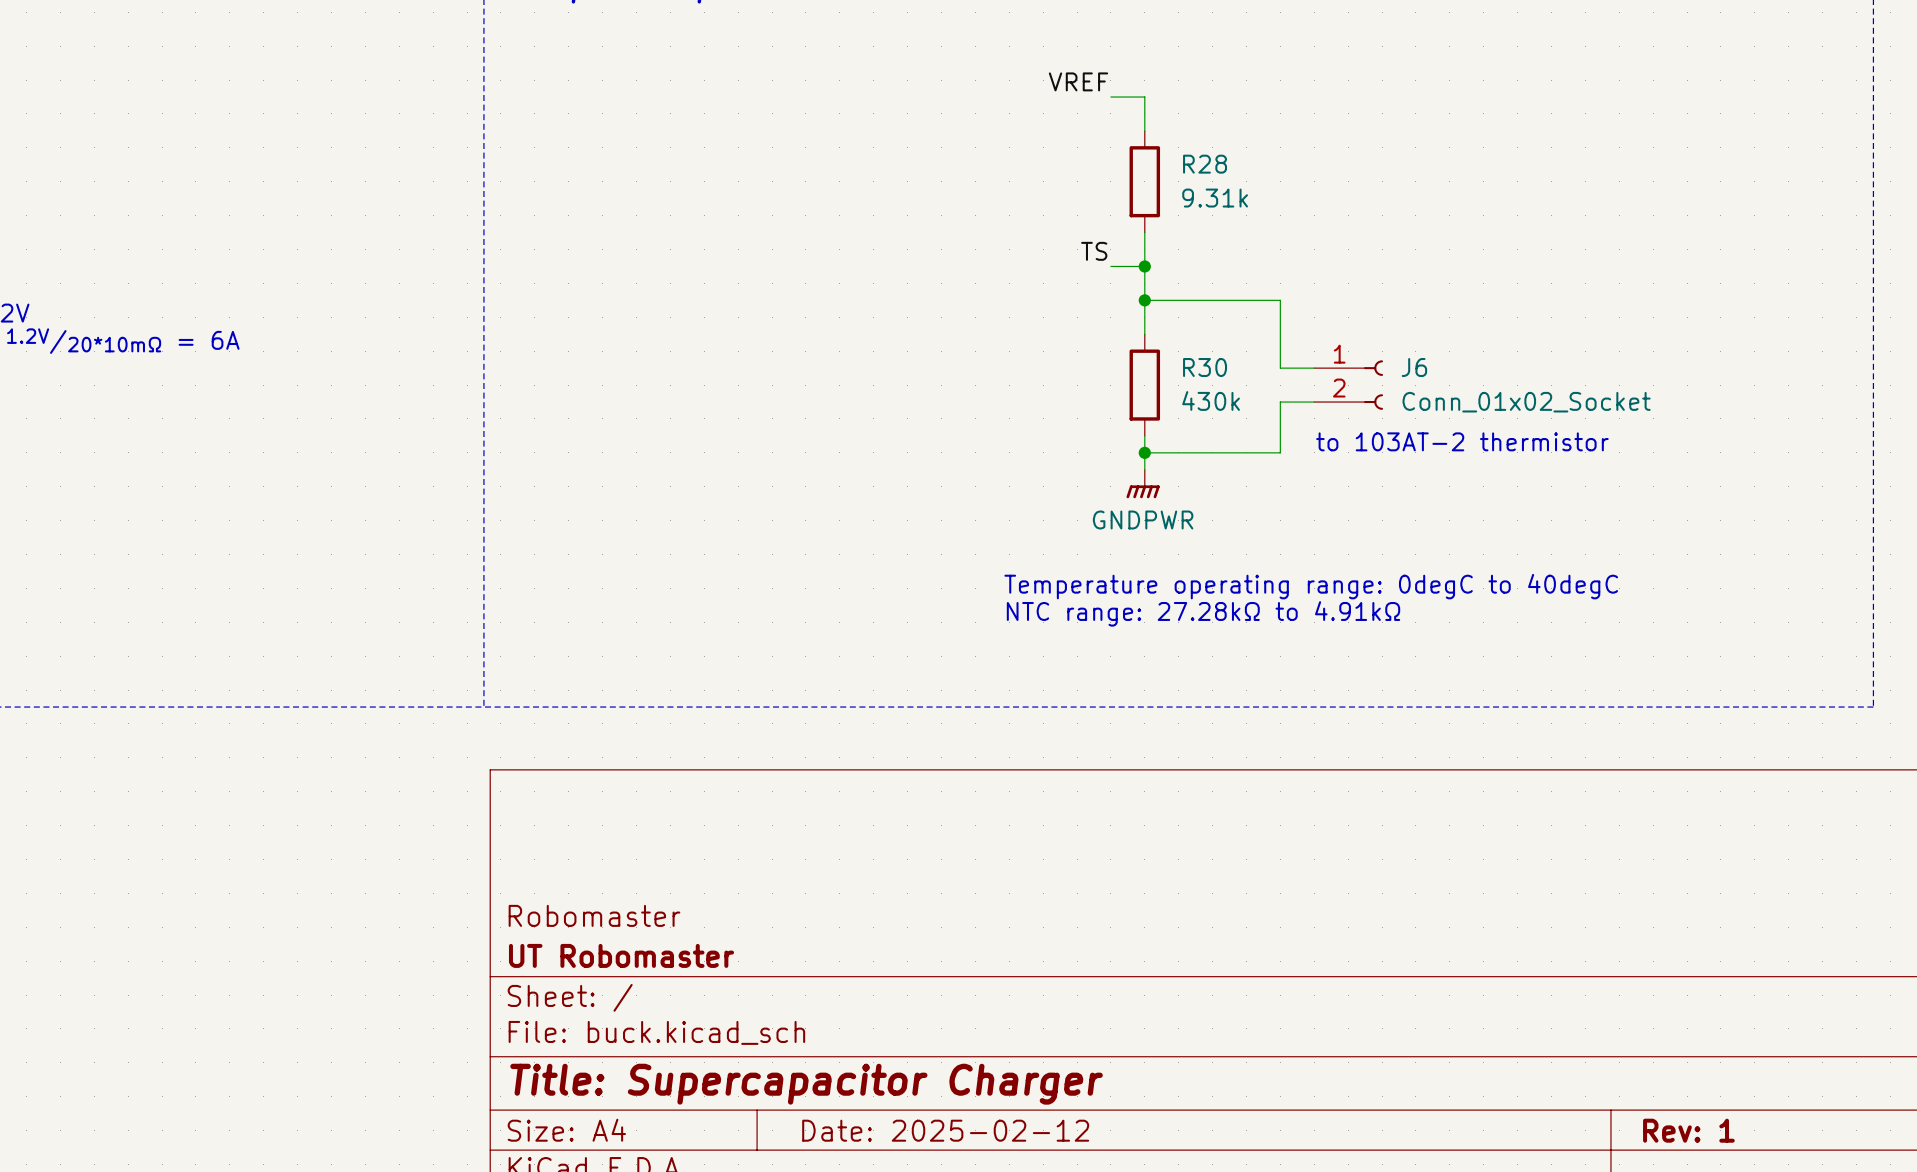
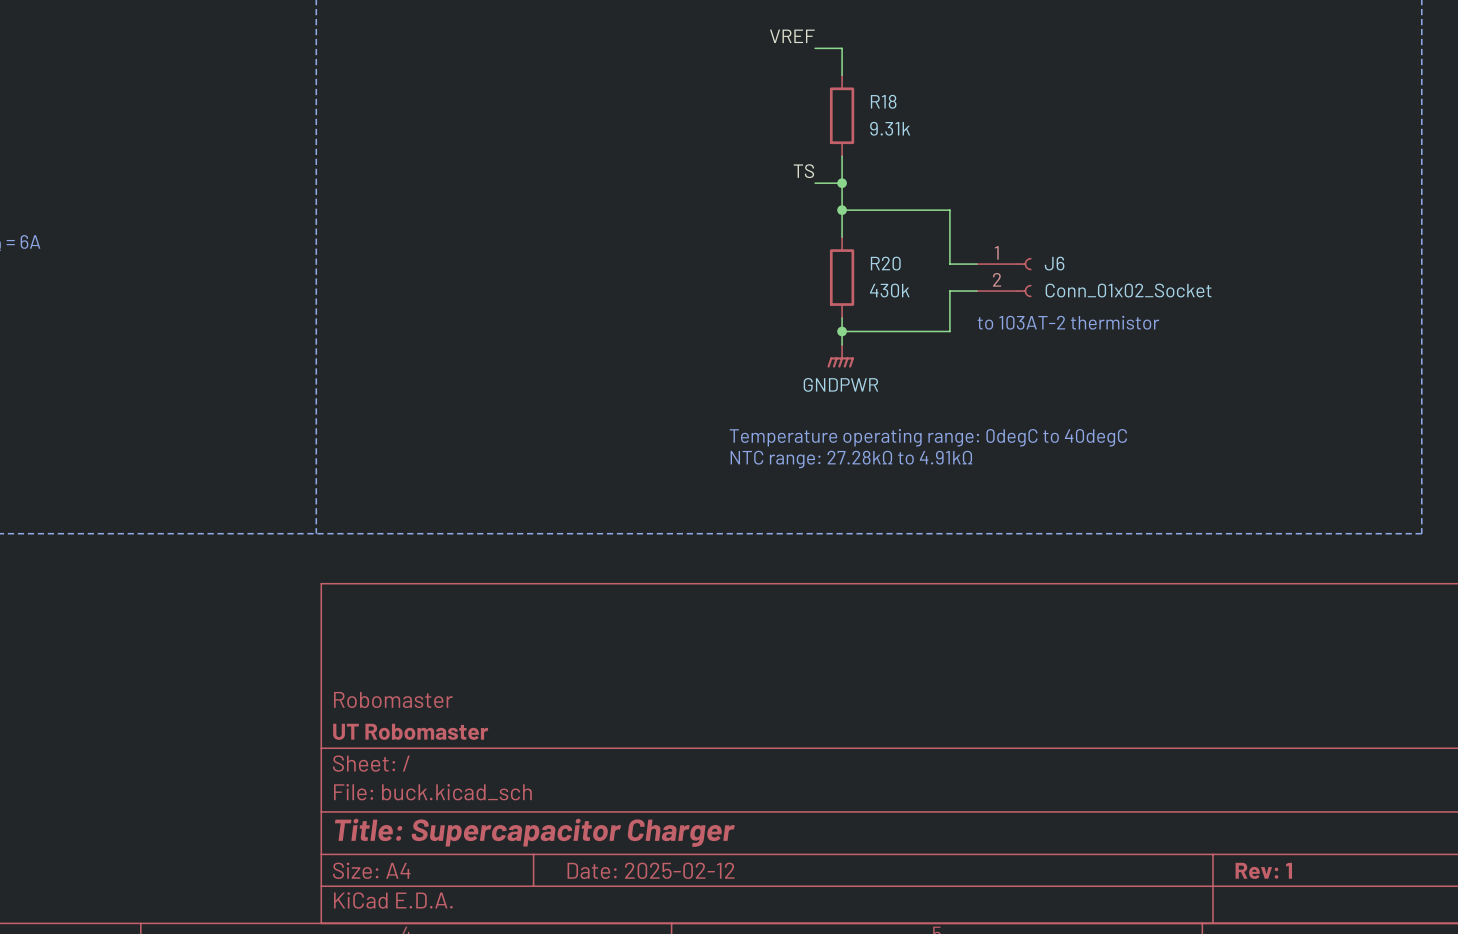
R28 name: R28 (1205, 164) -> R18 (883, 101)
R30 name: R30 (1205, 367) -> R20 (885, 263)

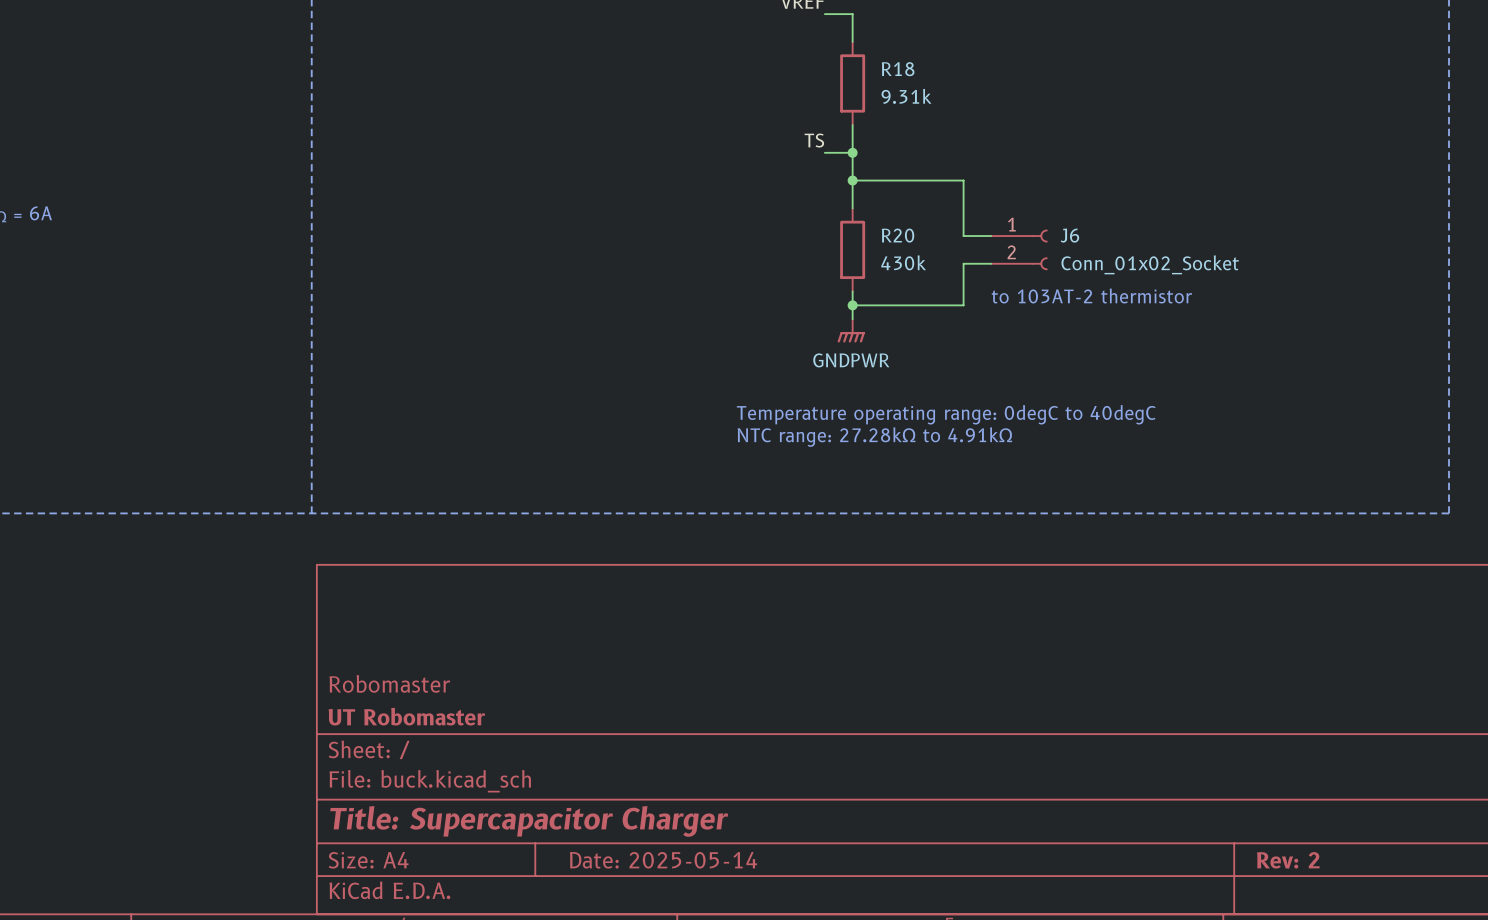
title block: Date: 2025-02-12 (651, 870) -> Date: 2025-05-14 (663, 860)
title block: Rev: 1 (1263, 870) -> Rev: 2 (1288, 860)

